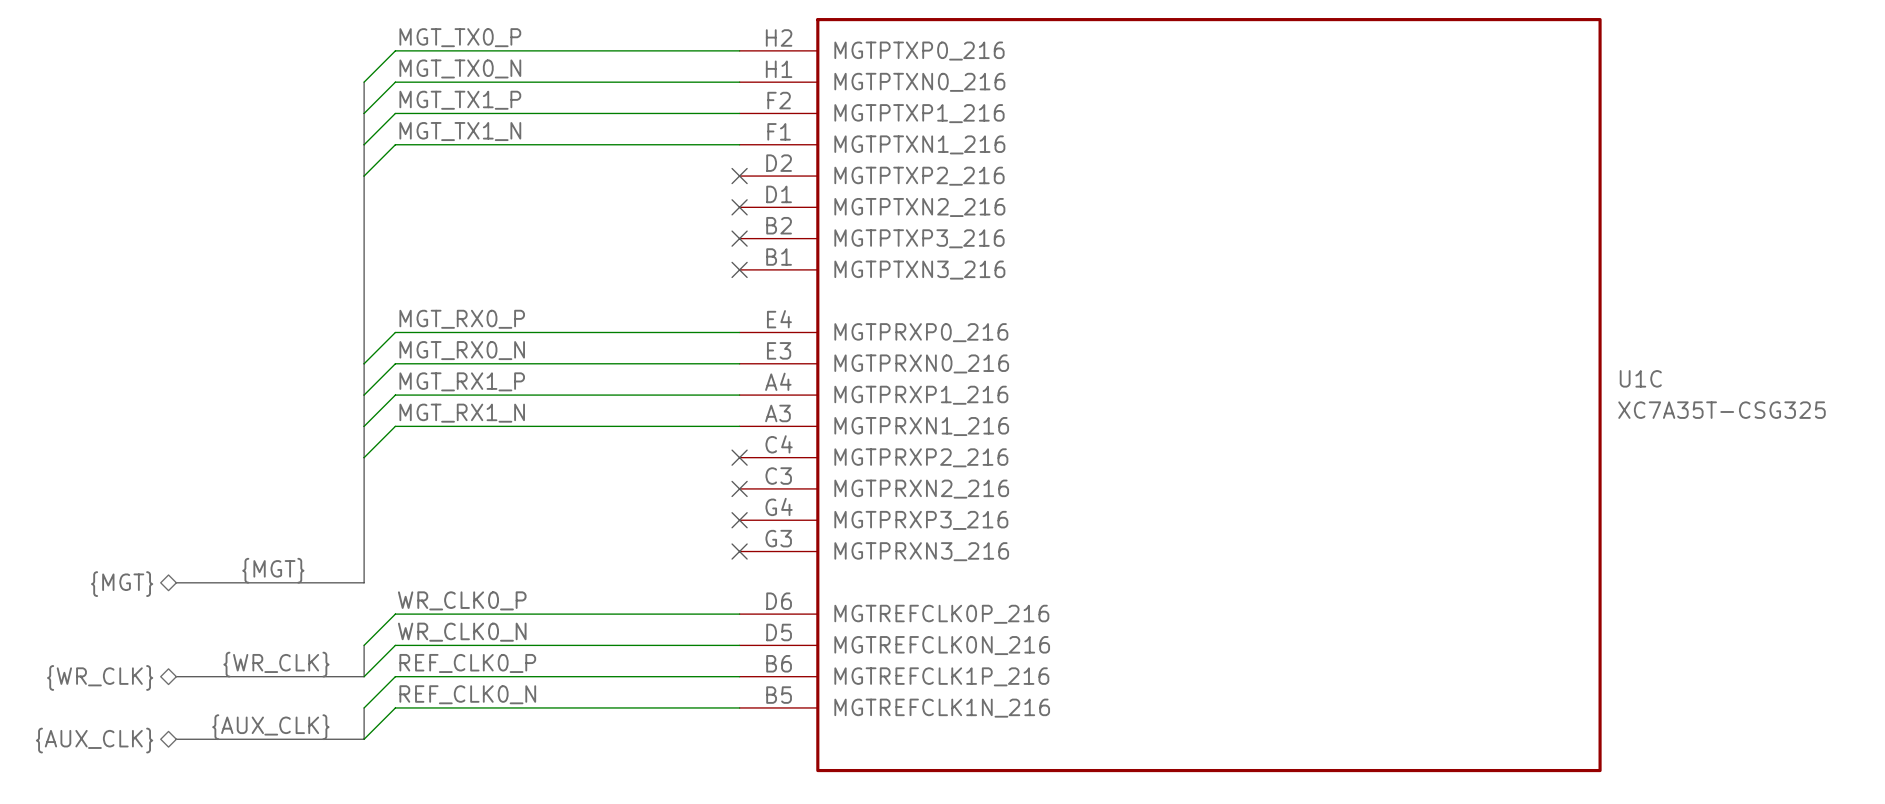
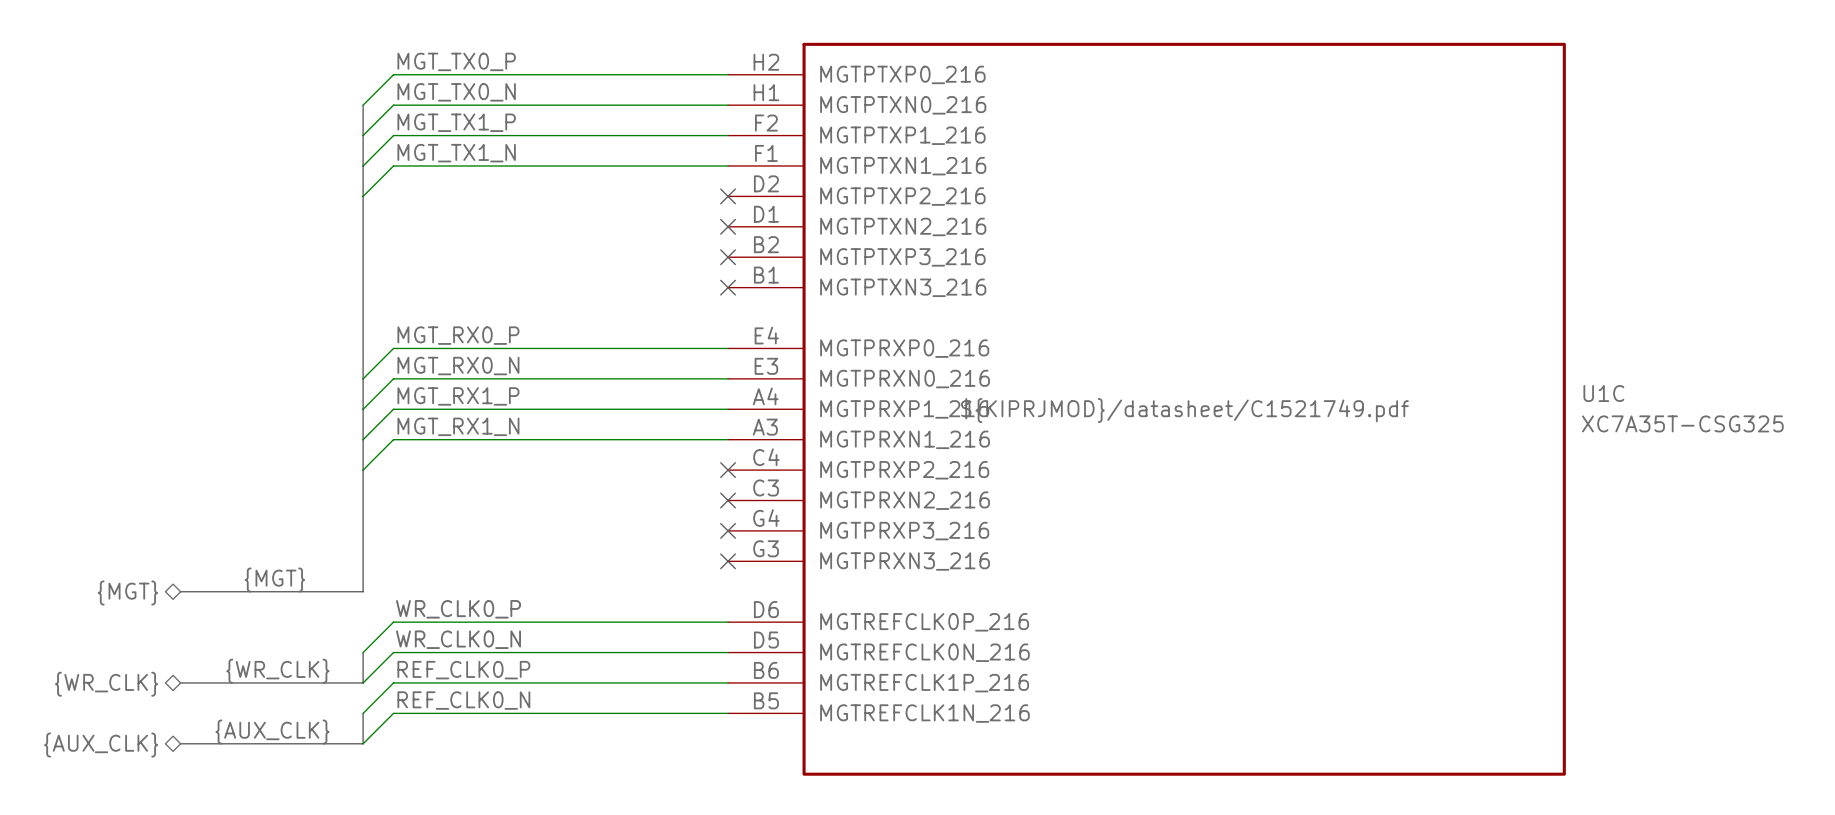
U1C text: none -> ${KIPRJMOD}/datasheet/C1521749.pdf (1184, 410)

